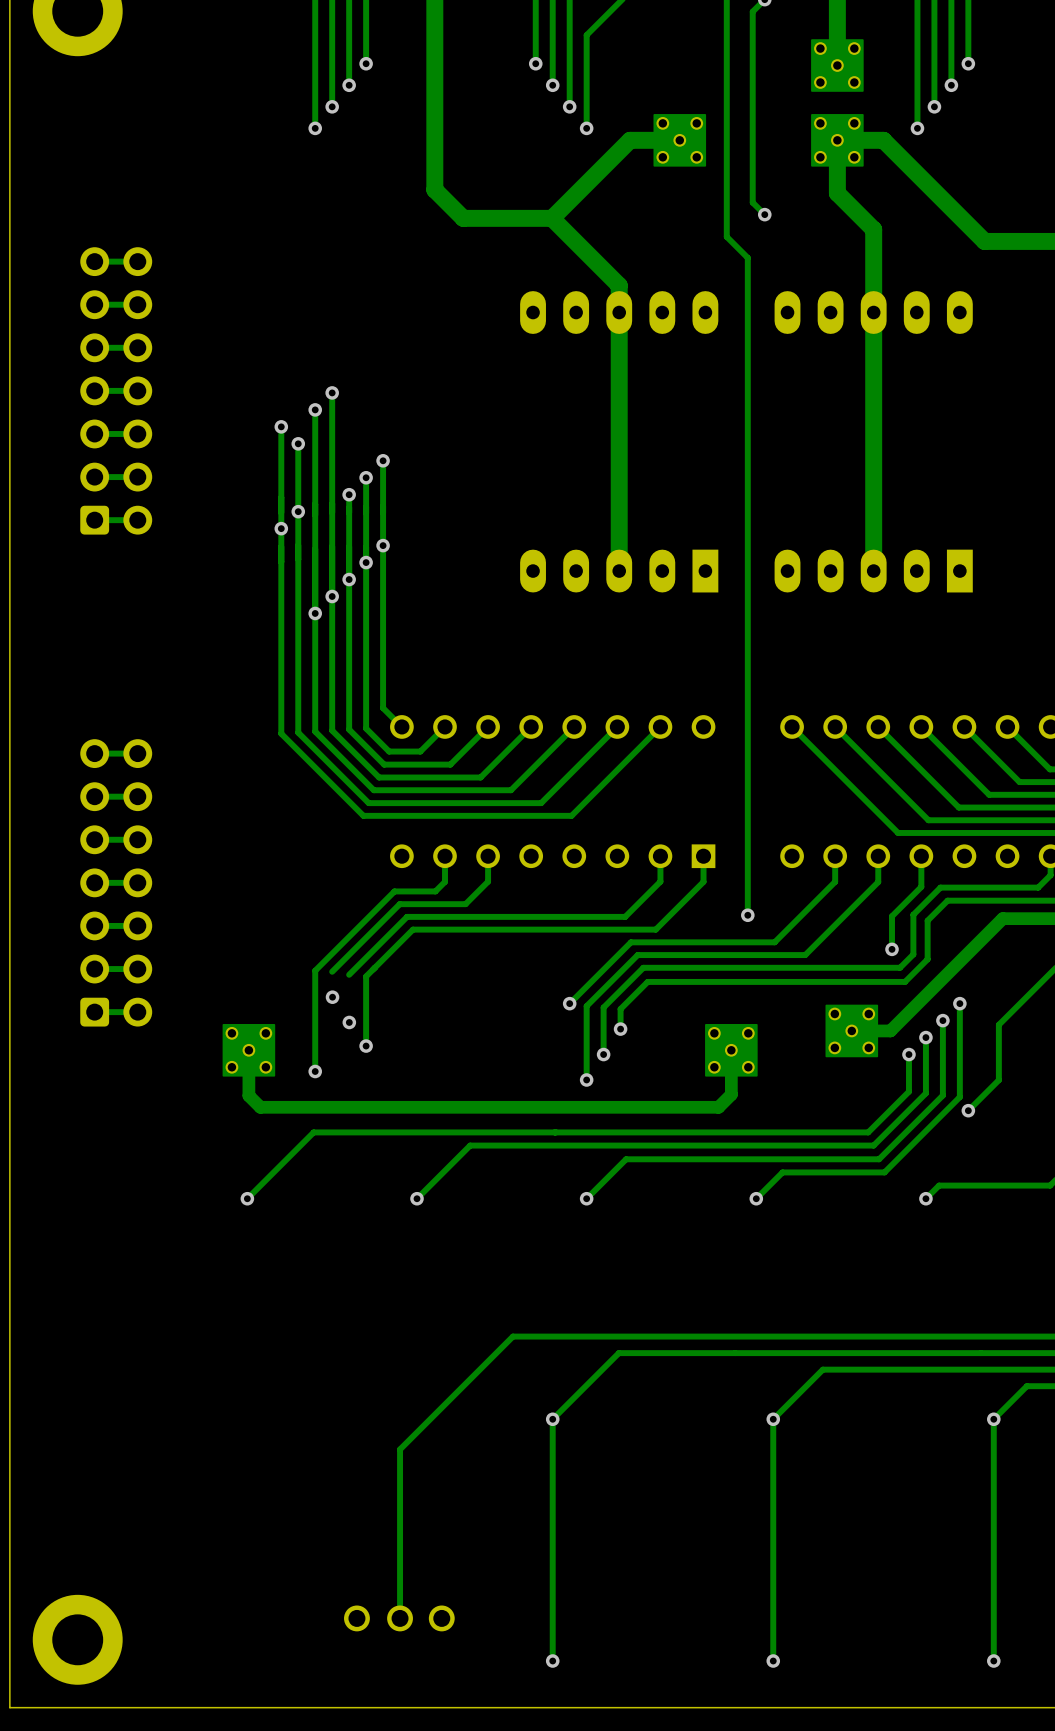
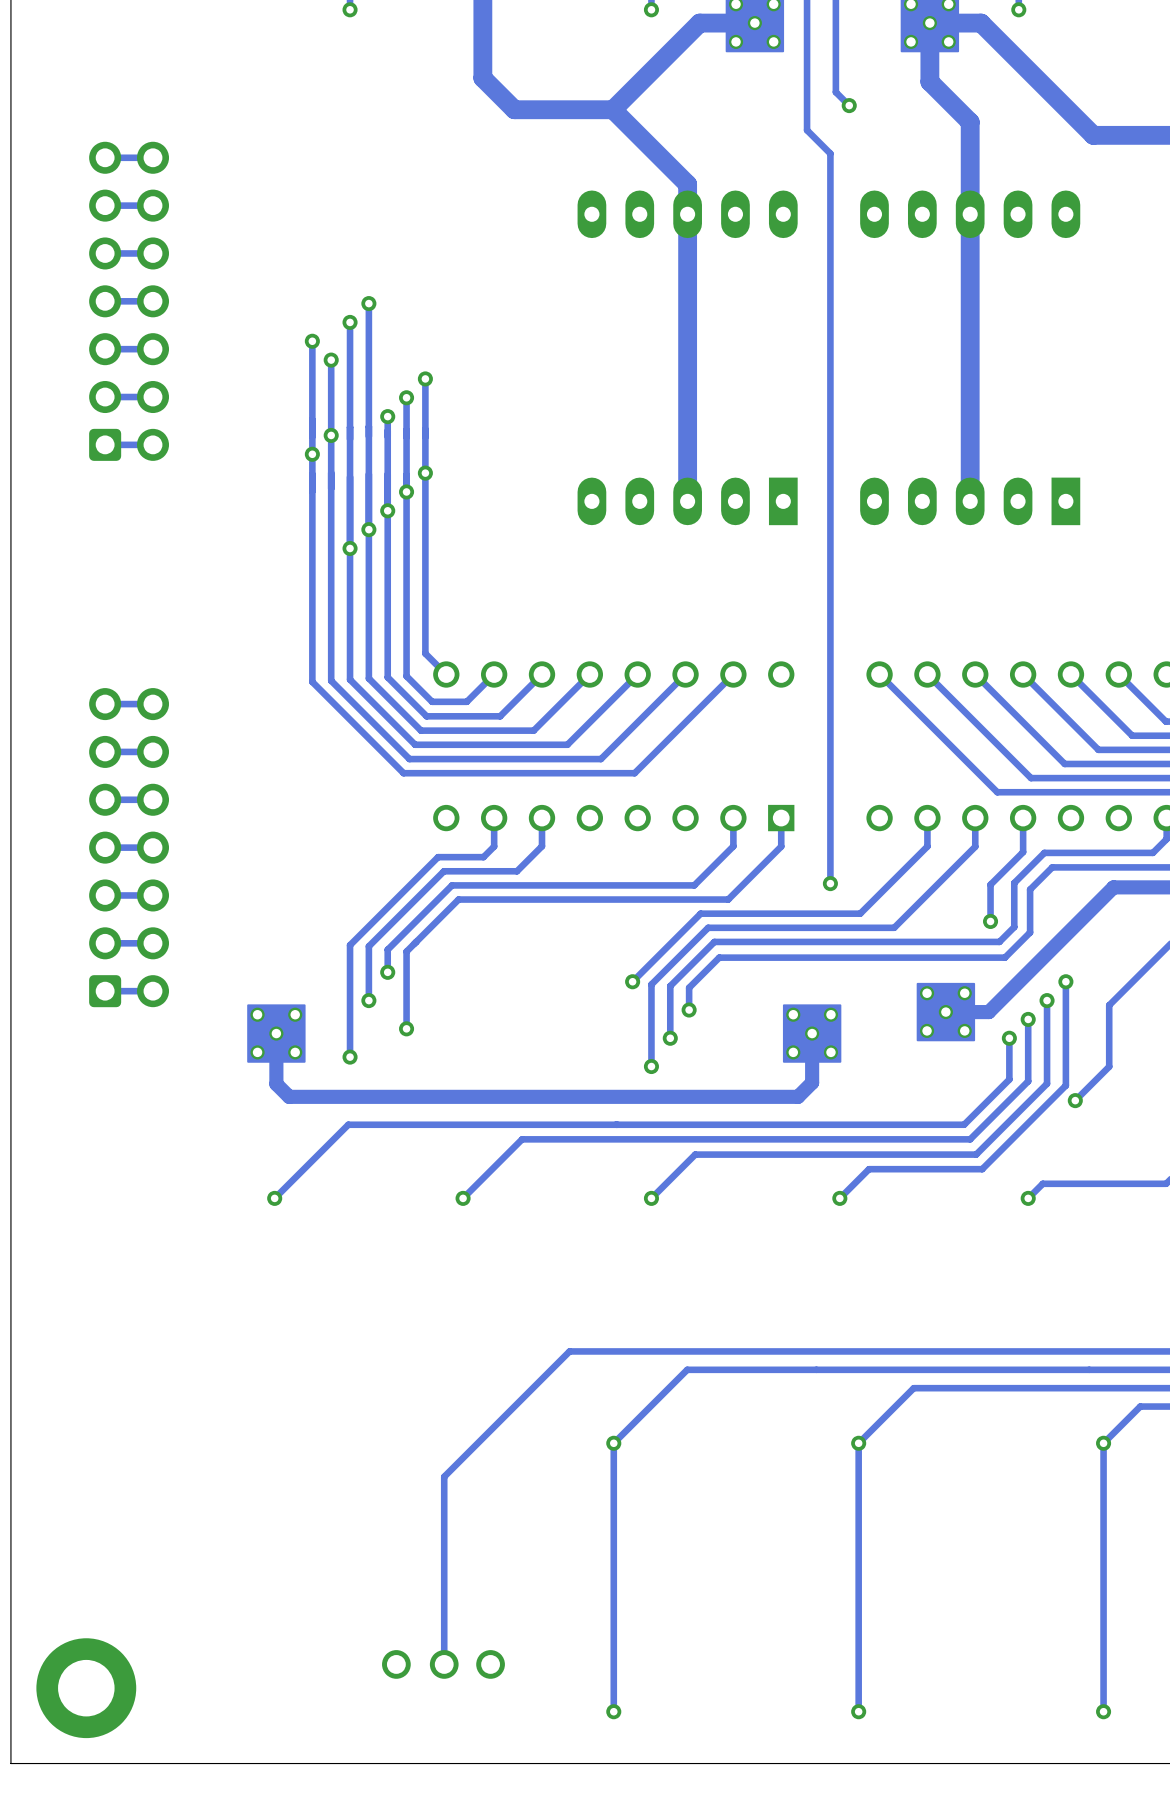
track: none -> (368, 946) (368, 1000)
track: none -> (387, 949) (387, 972)
via: none -> (387, 972)
via: (332, 997) -> none
via: none -> (368, 1000)
via: (349, 1022) -> none

